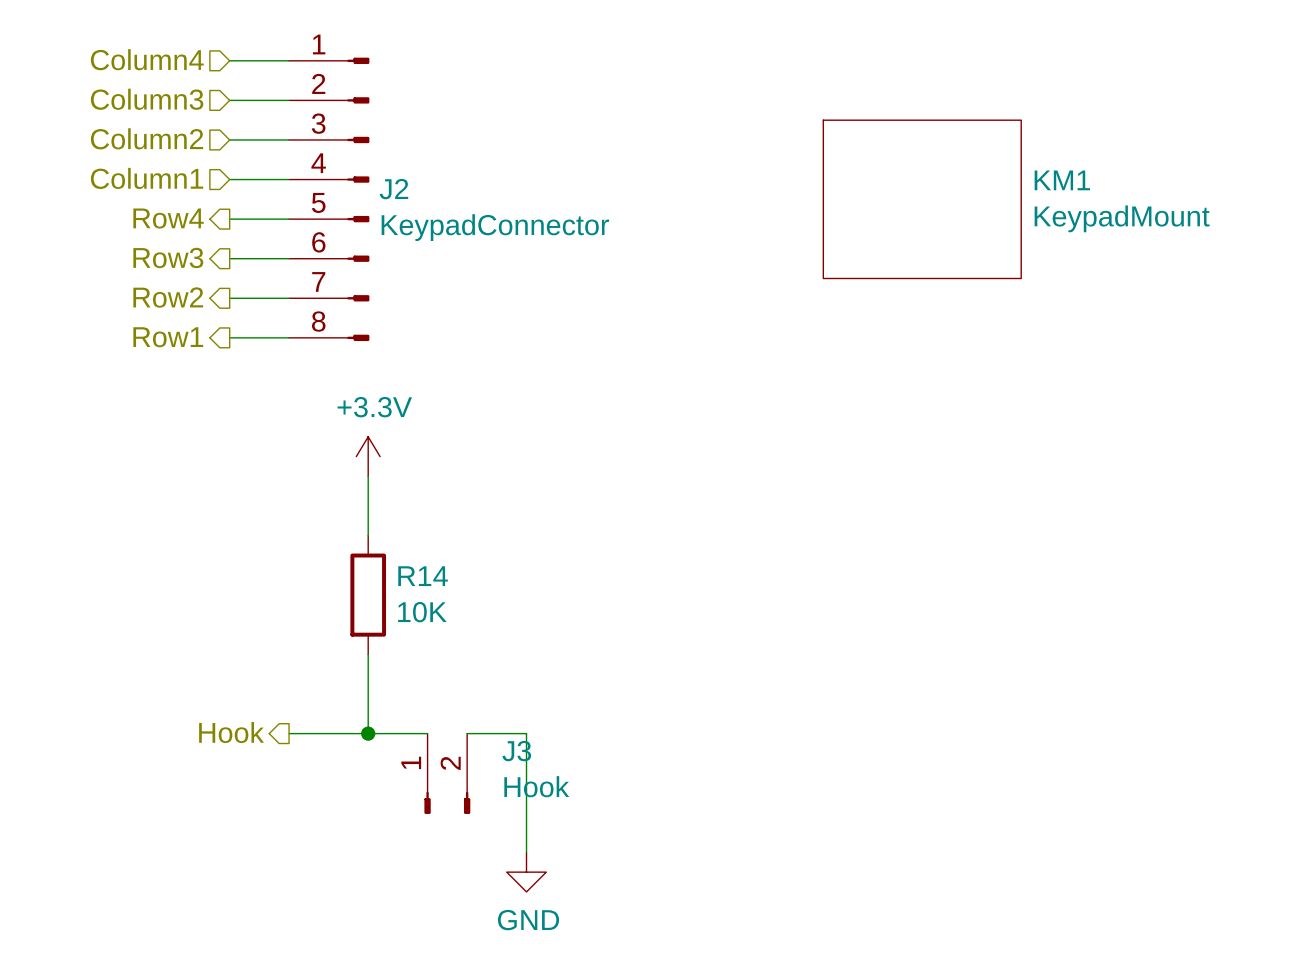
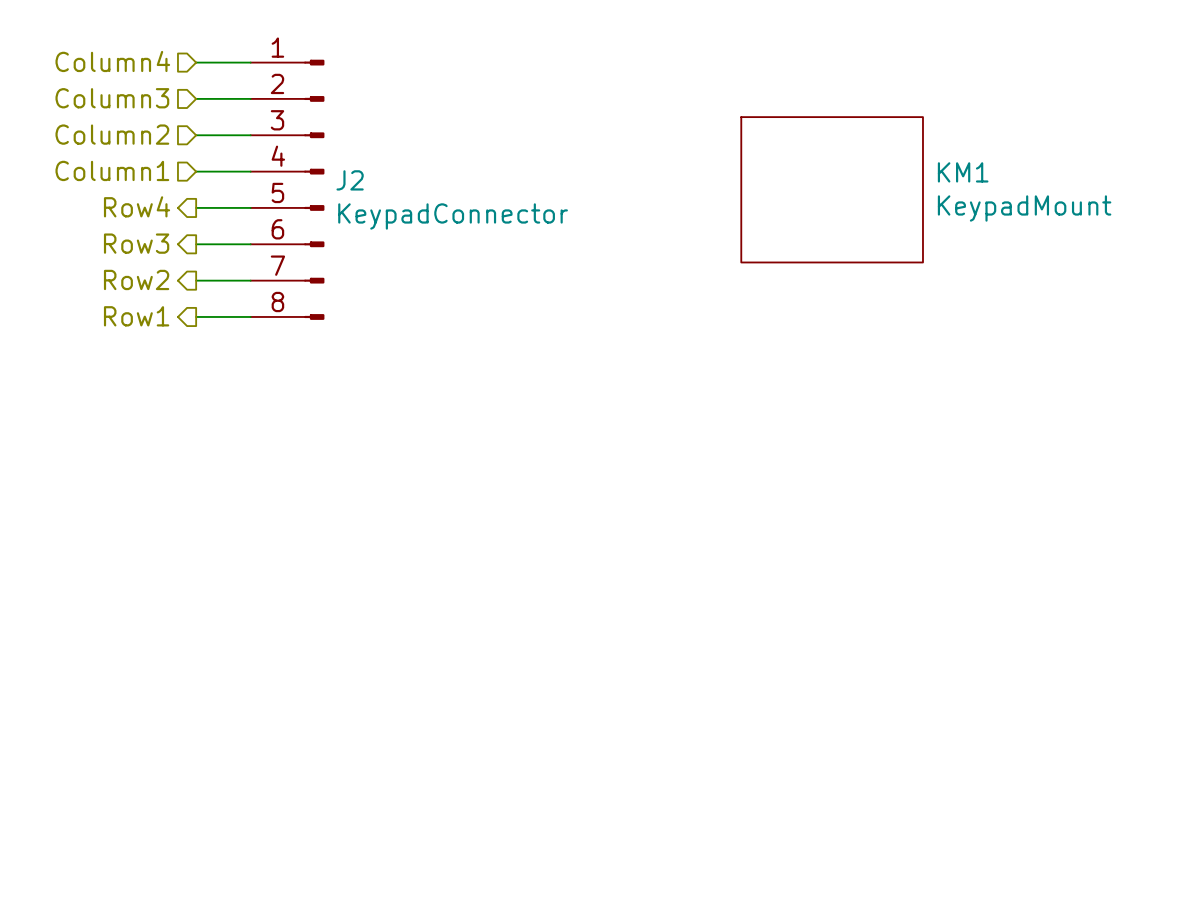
power symbol: +3.3V (368, 456) -> none
wire: (368, 476) (368, 535) -> none
R14: 10K (368, 595) -> none
wire: (368, 654) (368, 733) -> none
hierarchical label: Hook (231, 732) -> none
wire: (289, 733) (427, 733) -> none
junction: (368, 733) -> none
wire: (467, 733) (526, 733) (526, 852) -> none
J3: Hook (447, 773) -> none
power symbol: GND (526, 872) -> none

